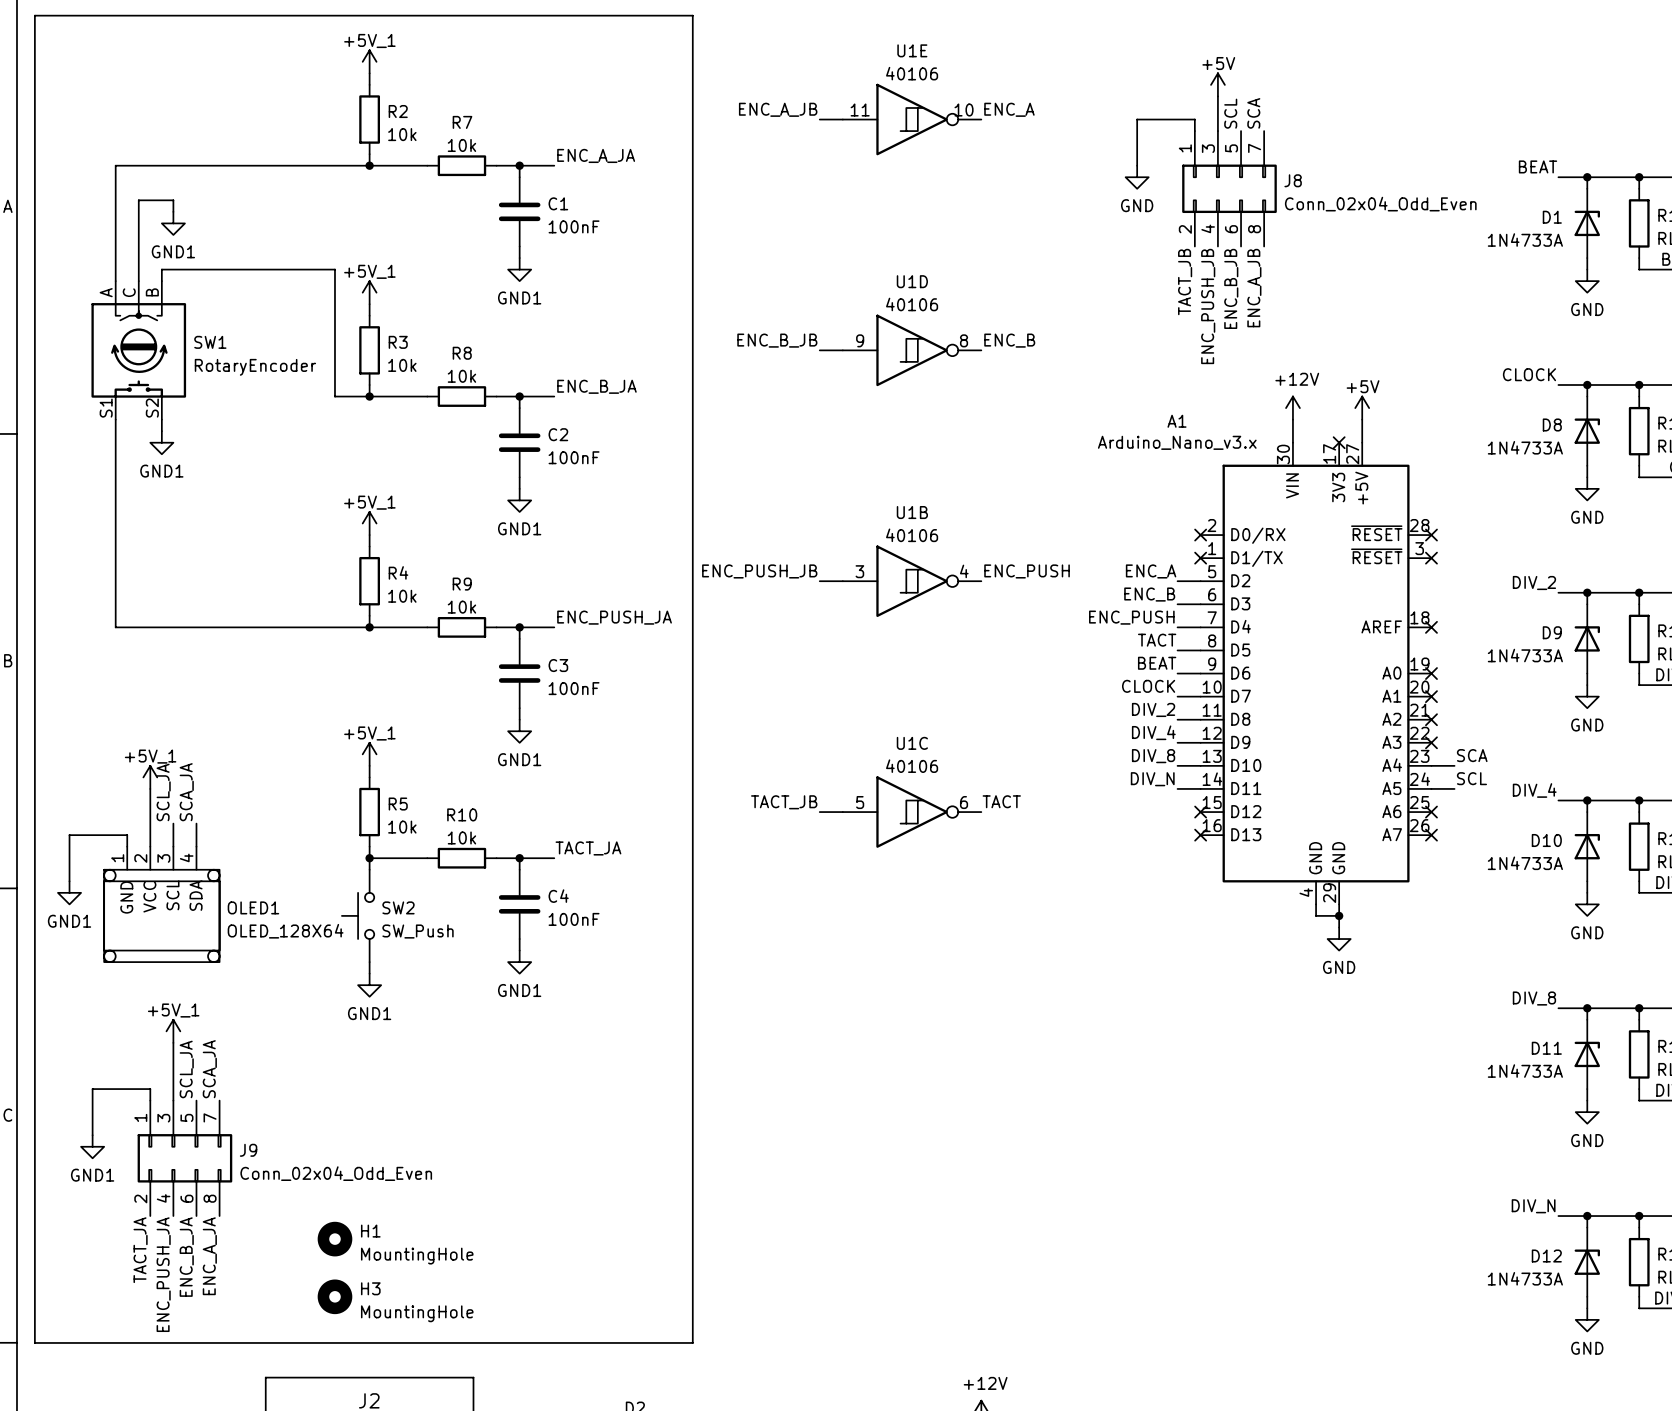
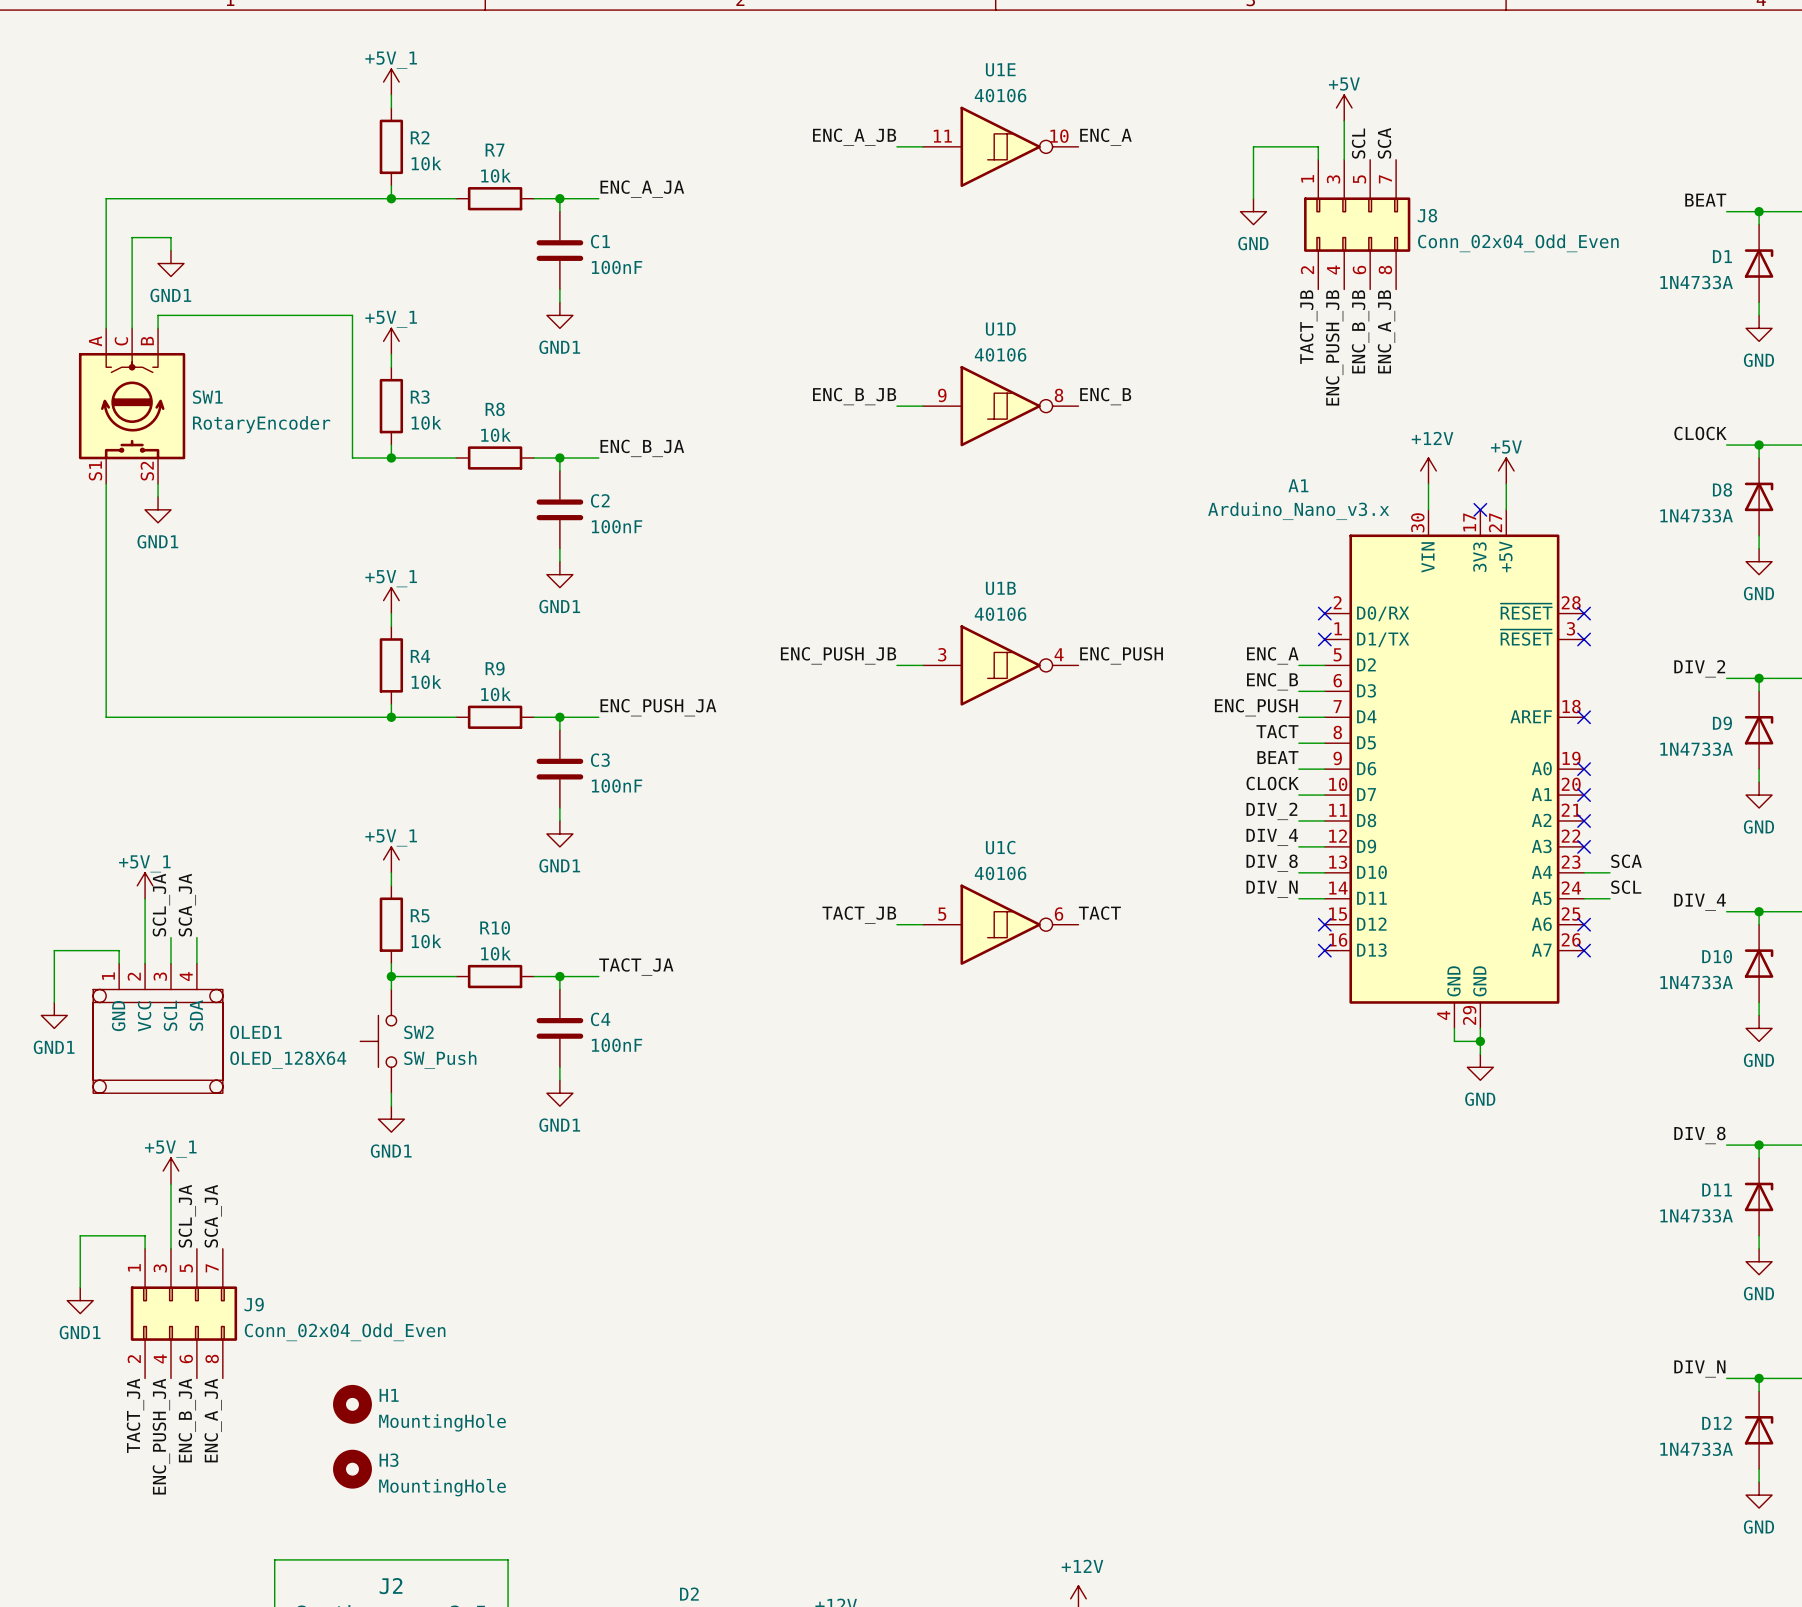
line: (34, 15) (34, 1342) (692, 1342) (692, 15) (34, 15) -> none

